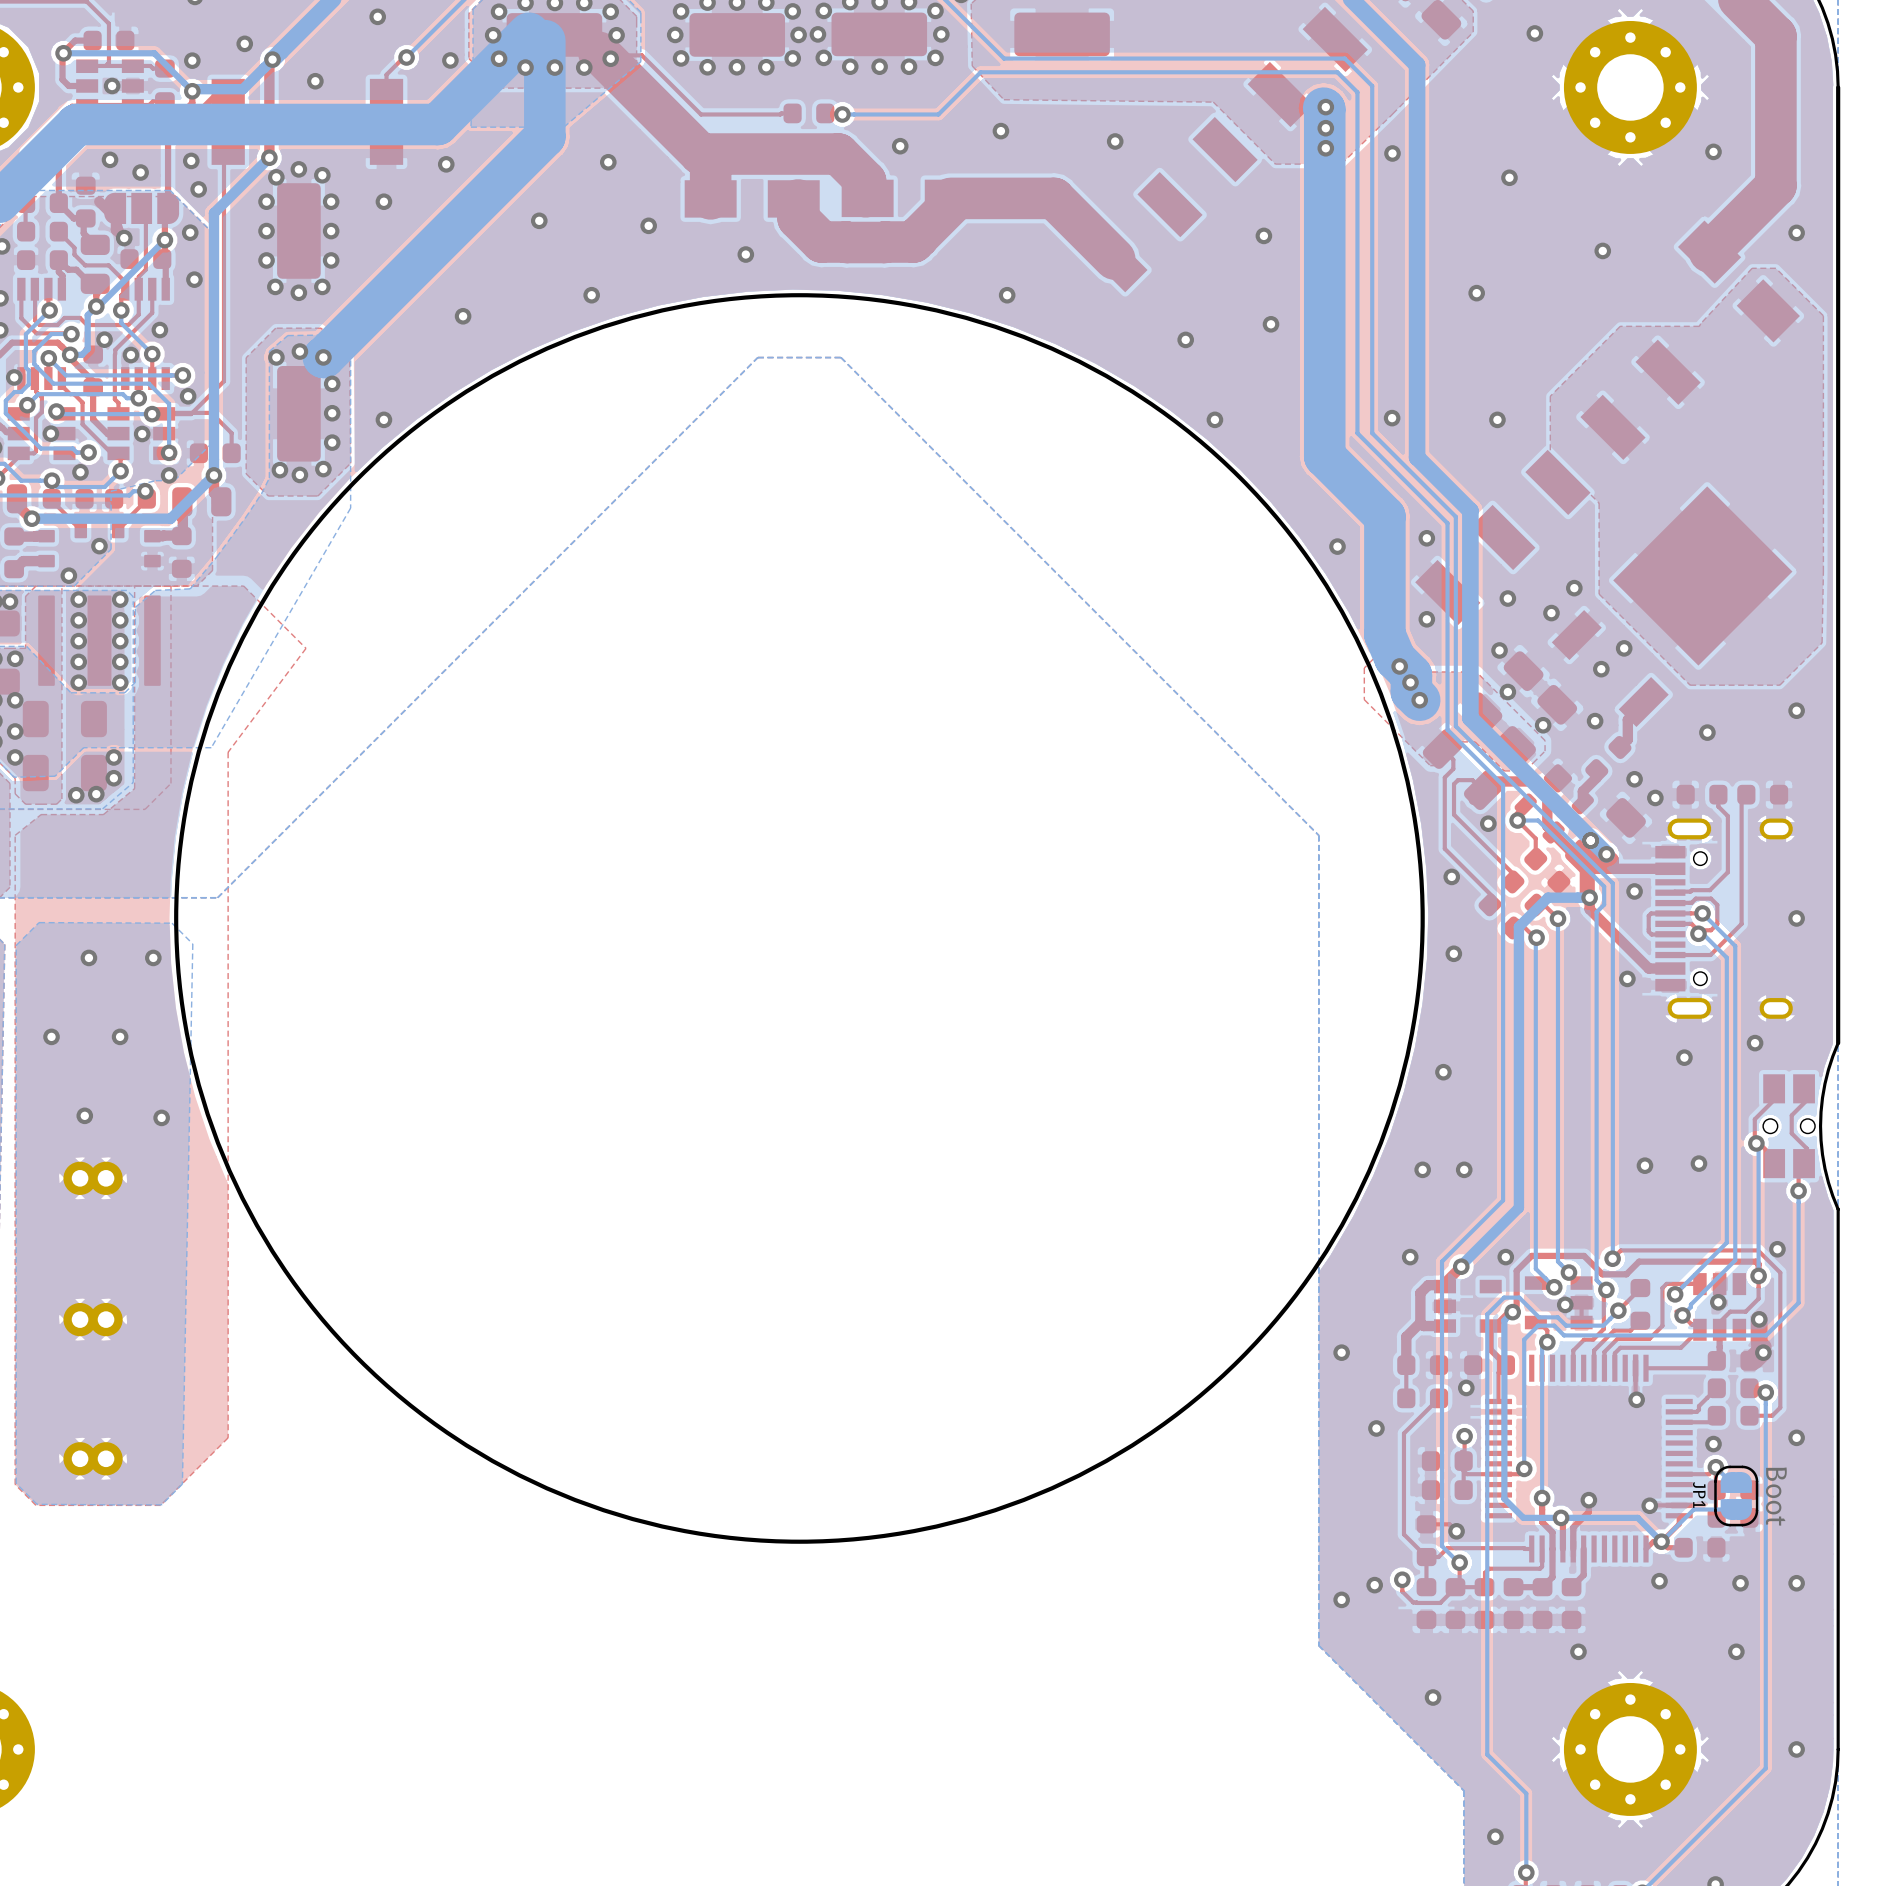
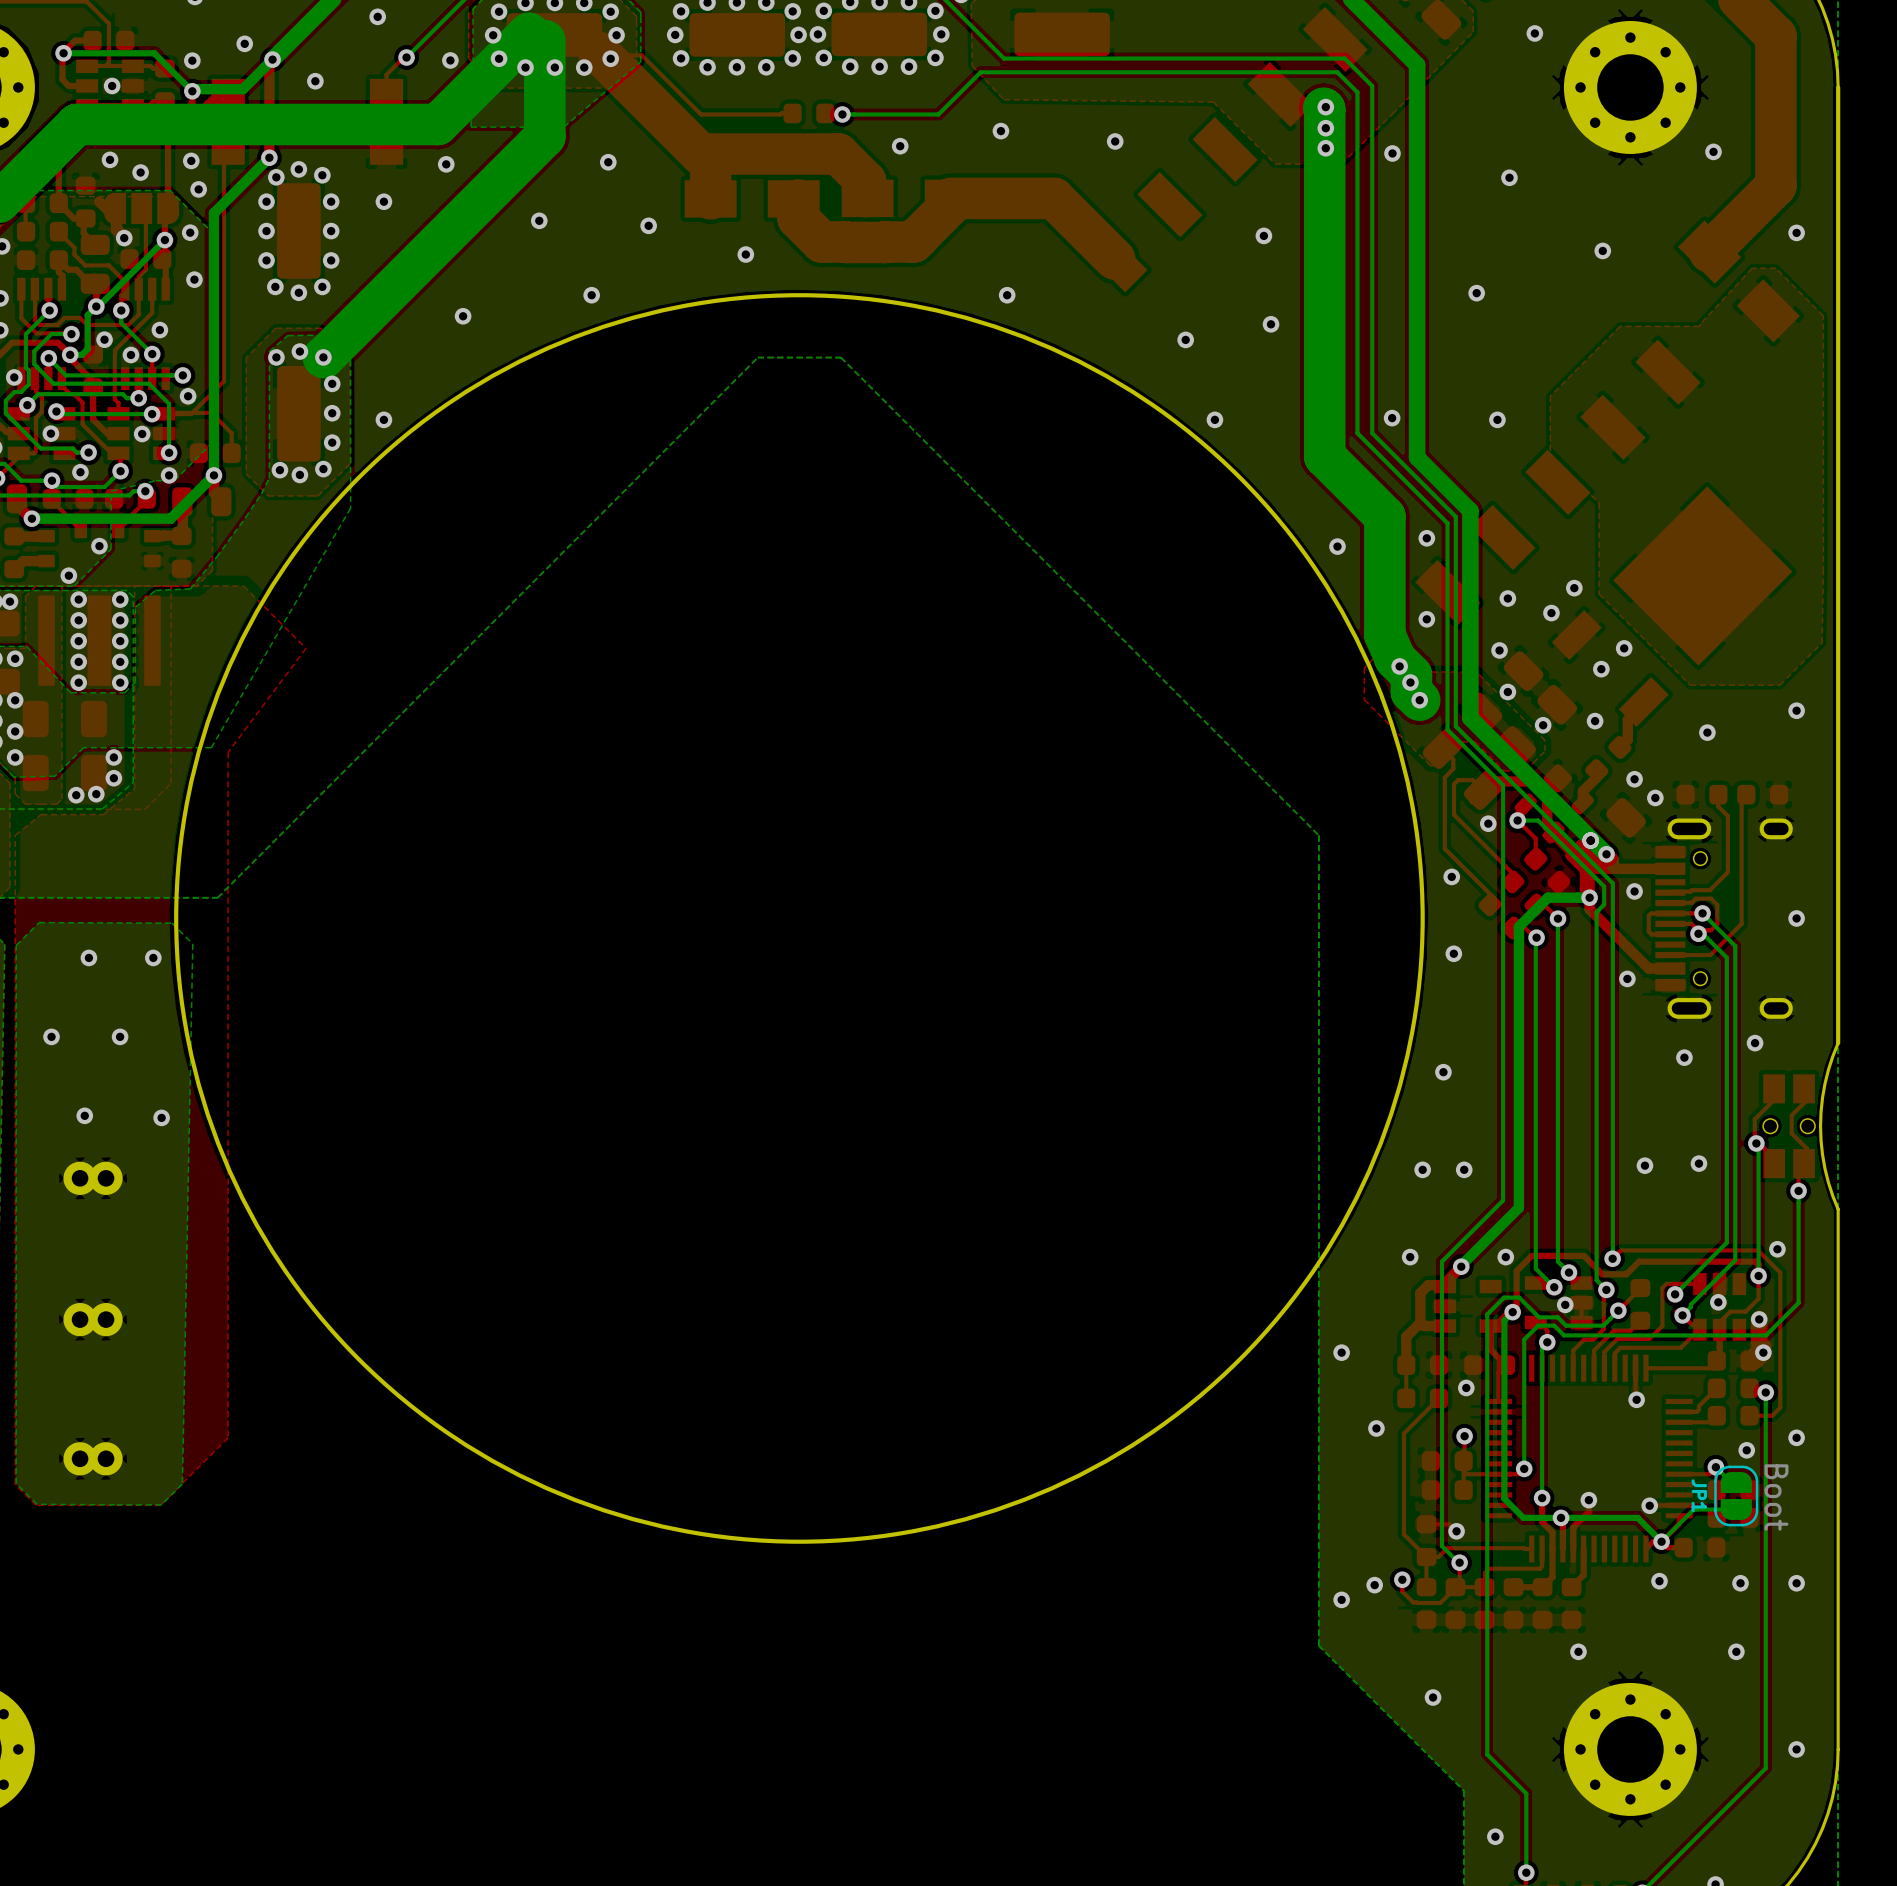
via position: (1713, 1444) -> (1746, 1450)

